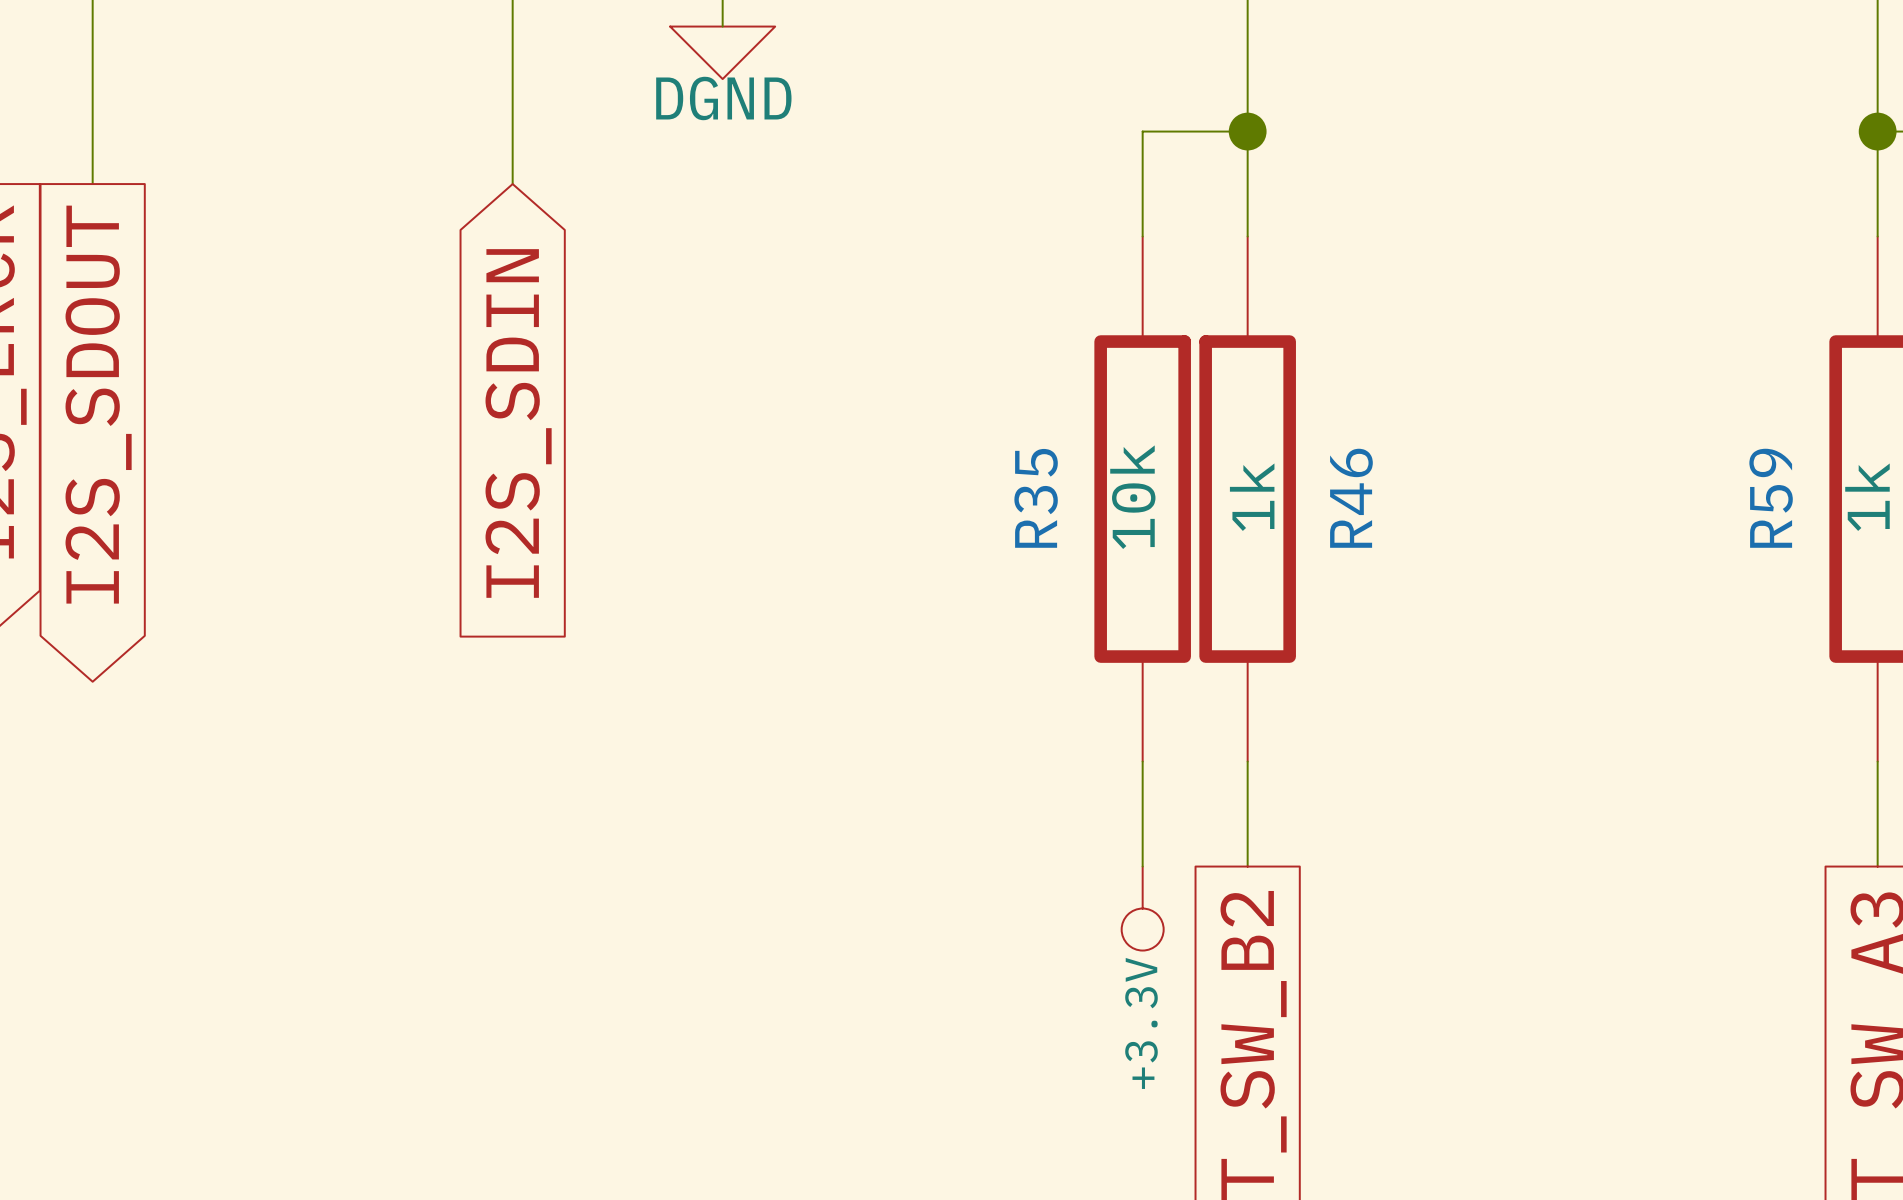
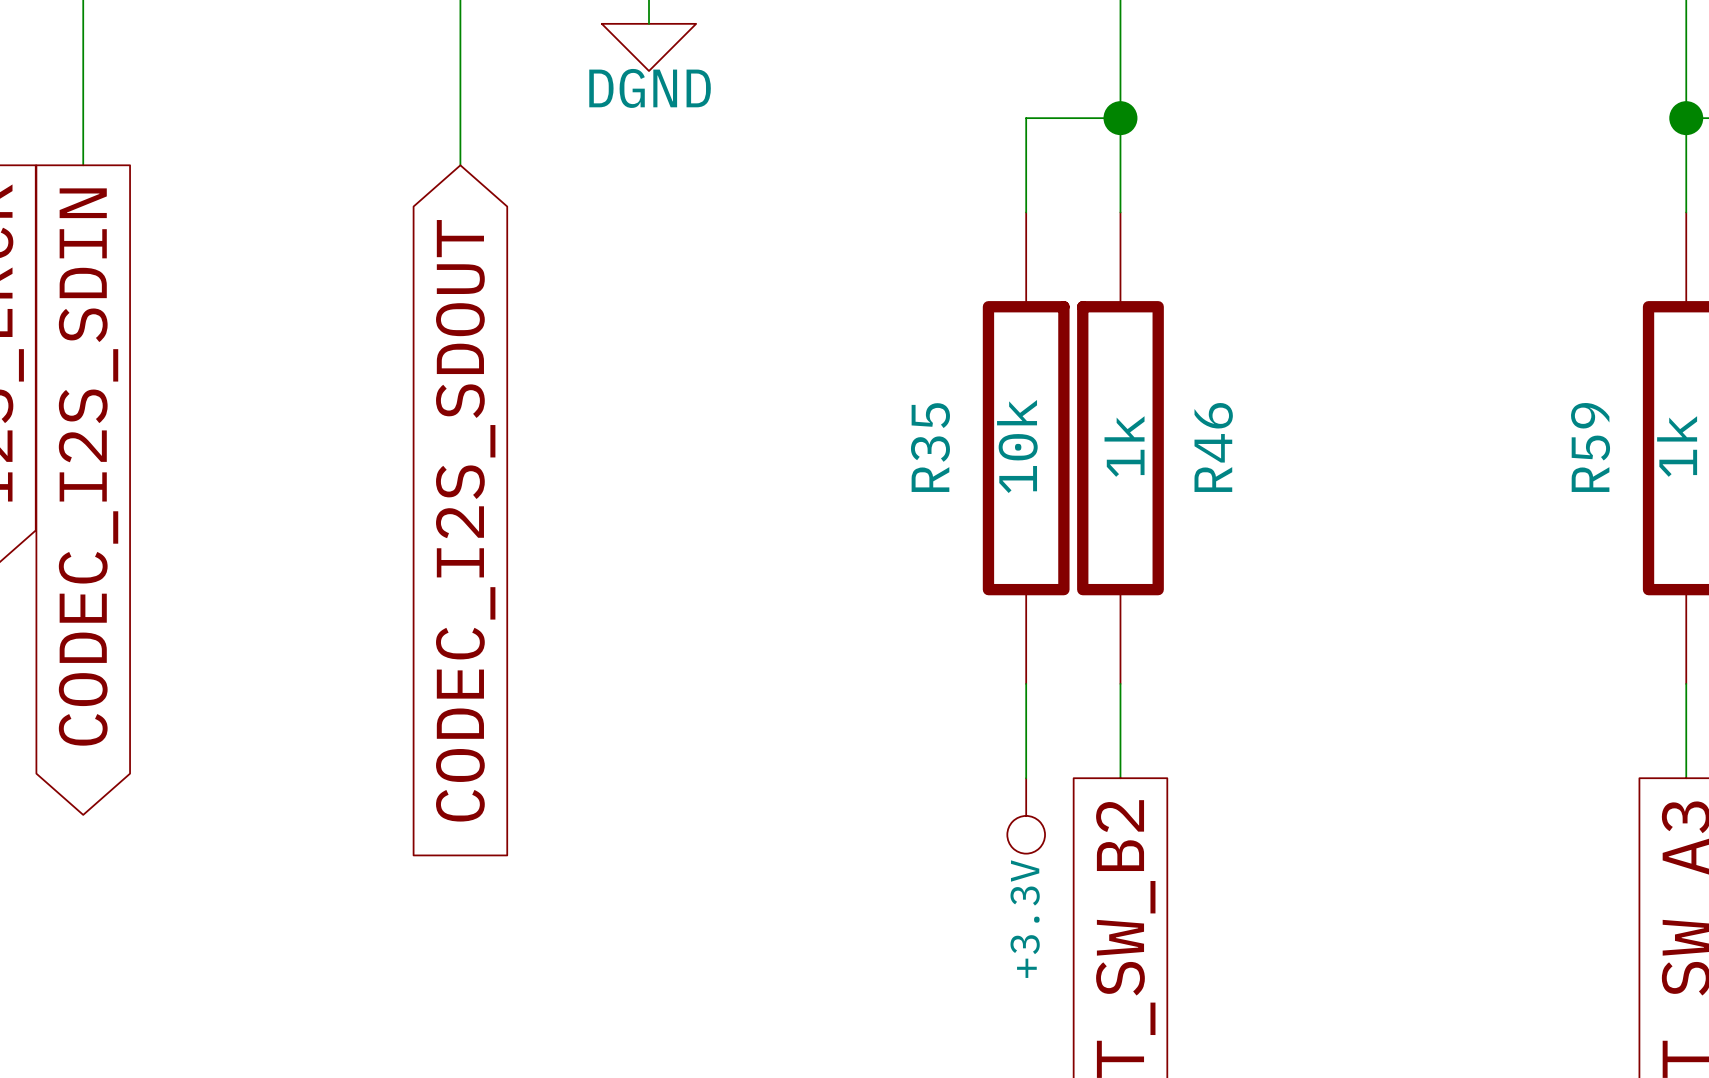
global label: I2S_SDOUT (98, 404) -> CODEC_I2S_SDIN (88, 467)
global label: I2S_SDIN (518, 423) -> CODEC_I2S_SDOUT (465, 520)

